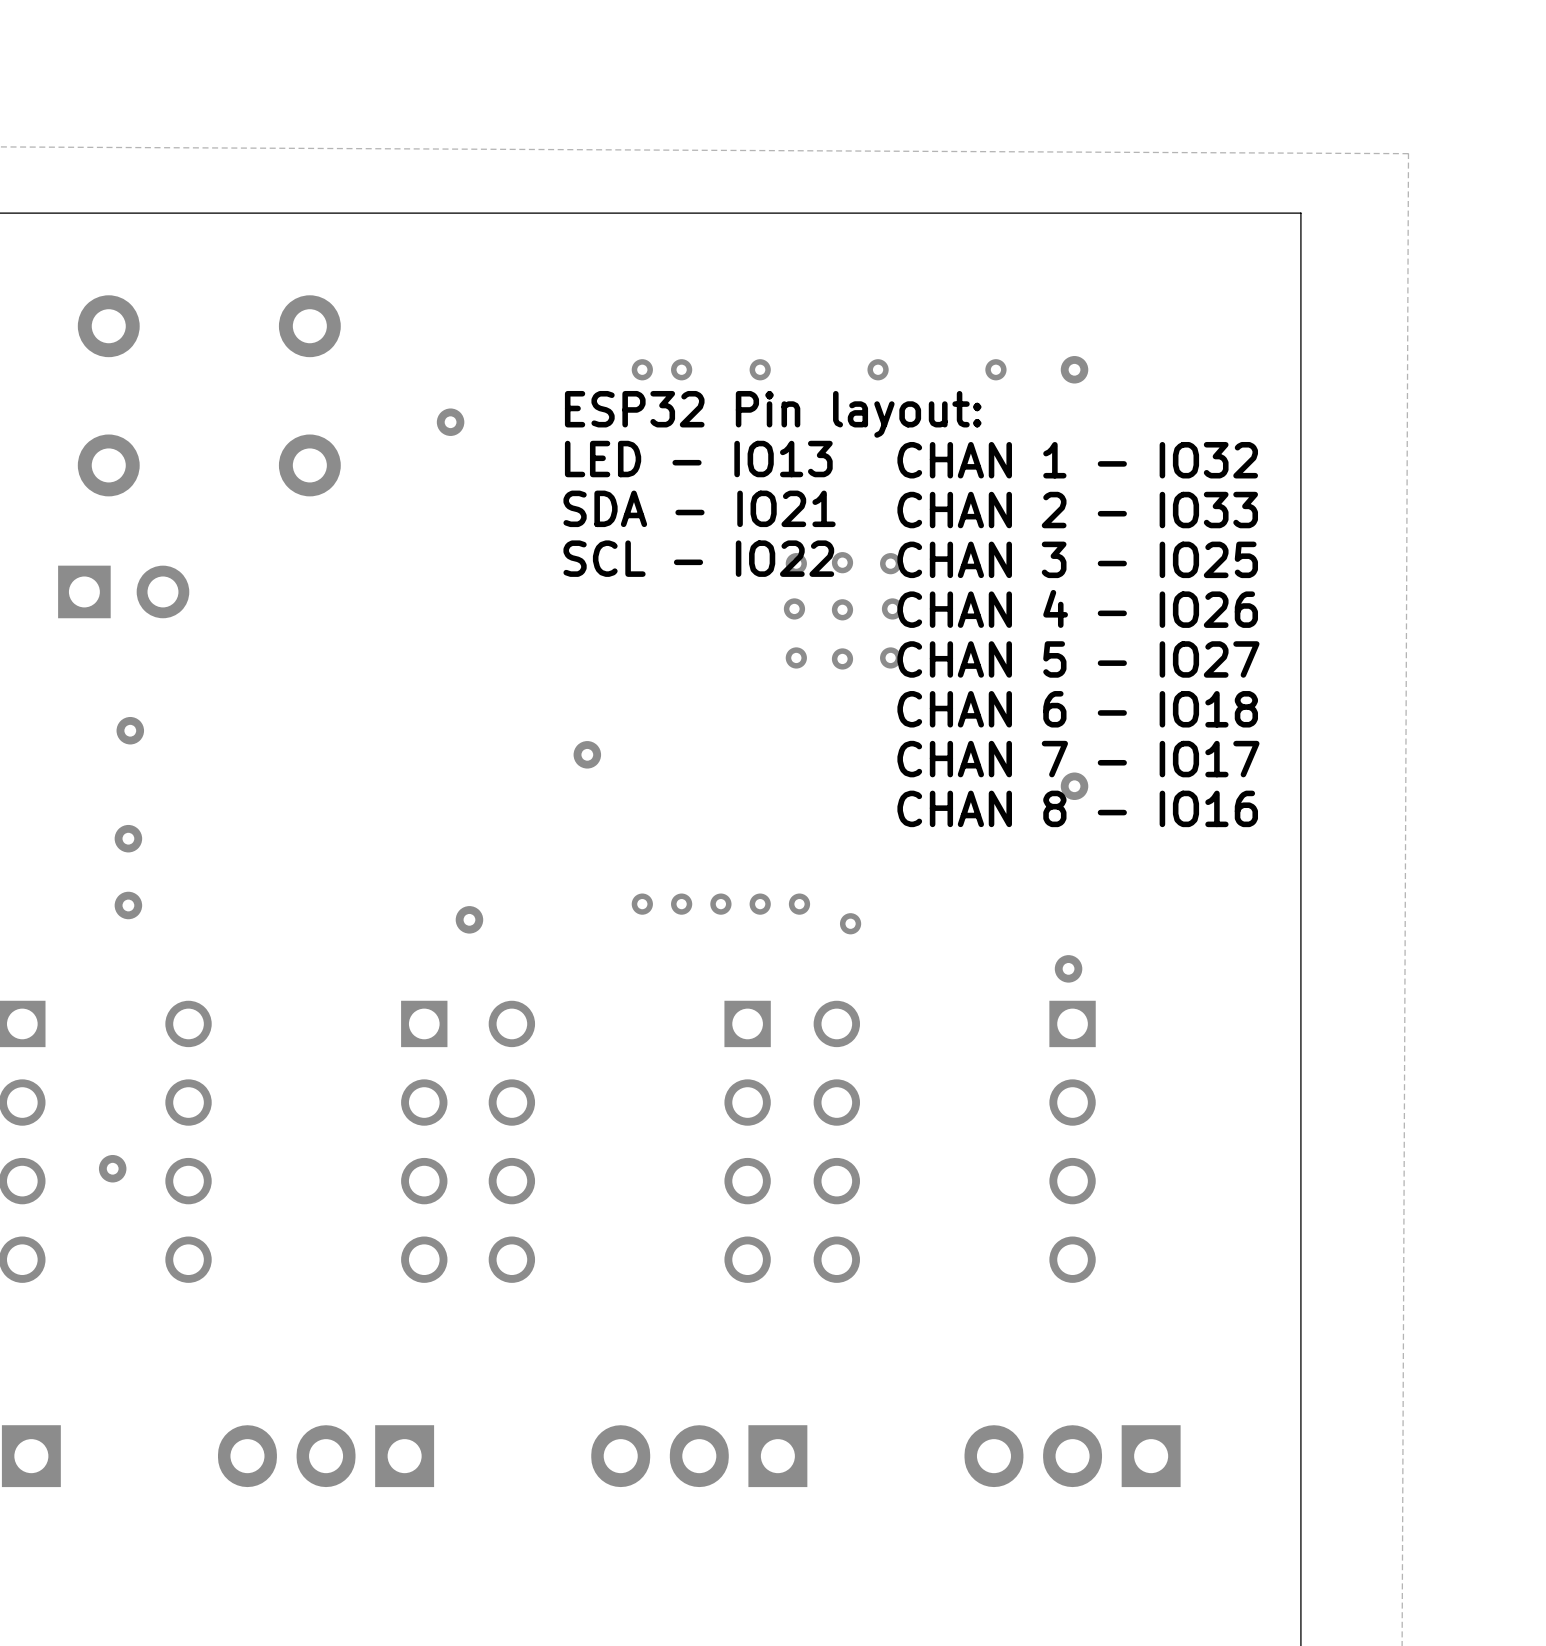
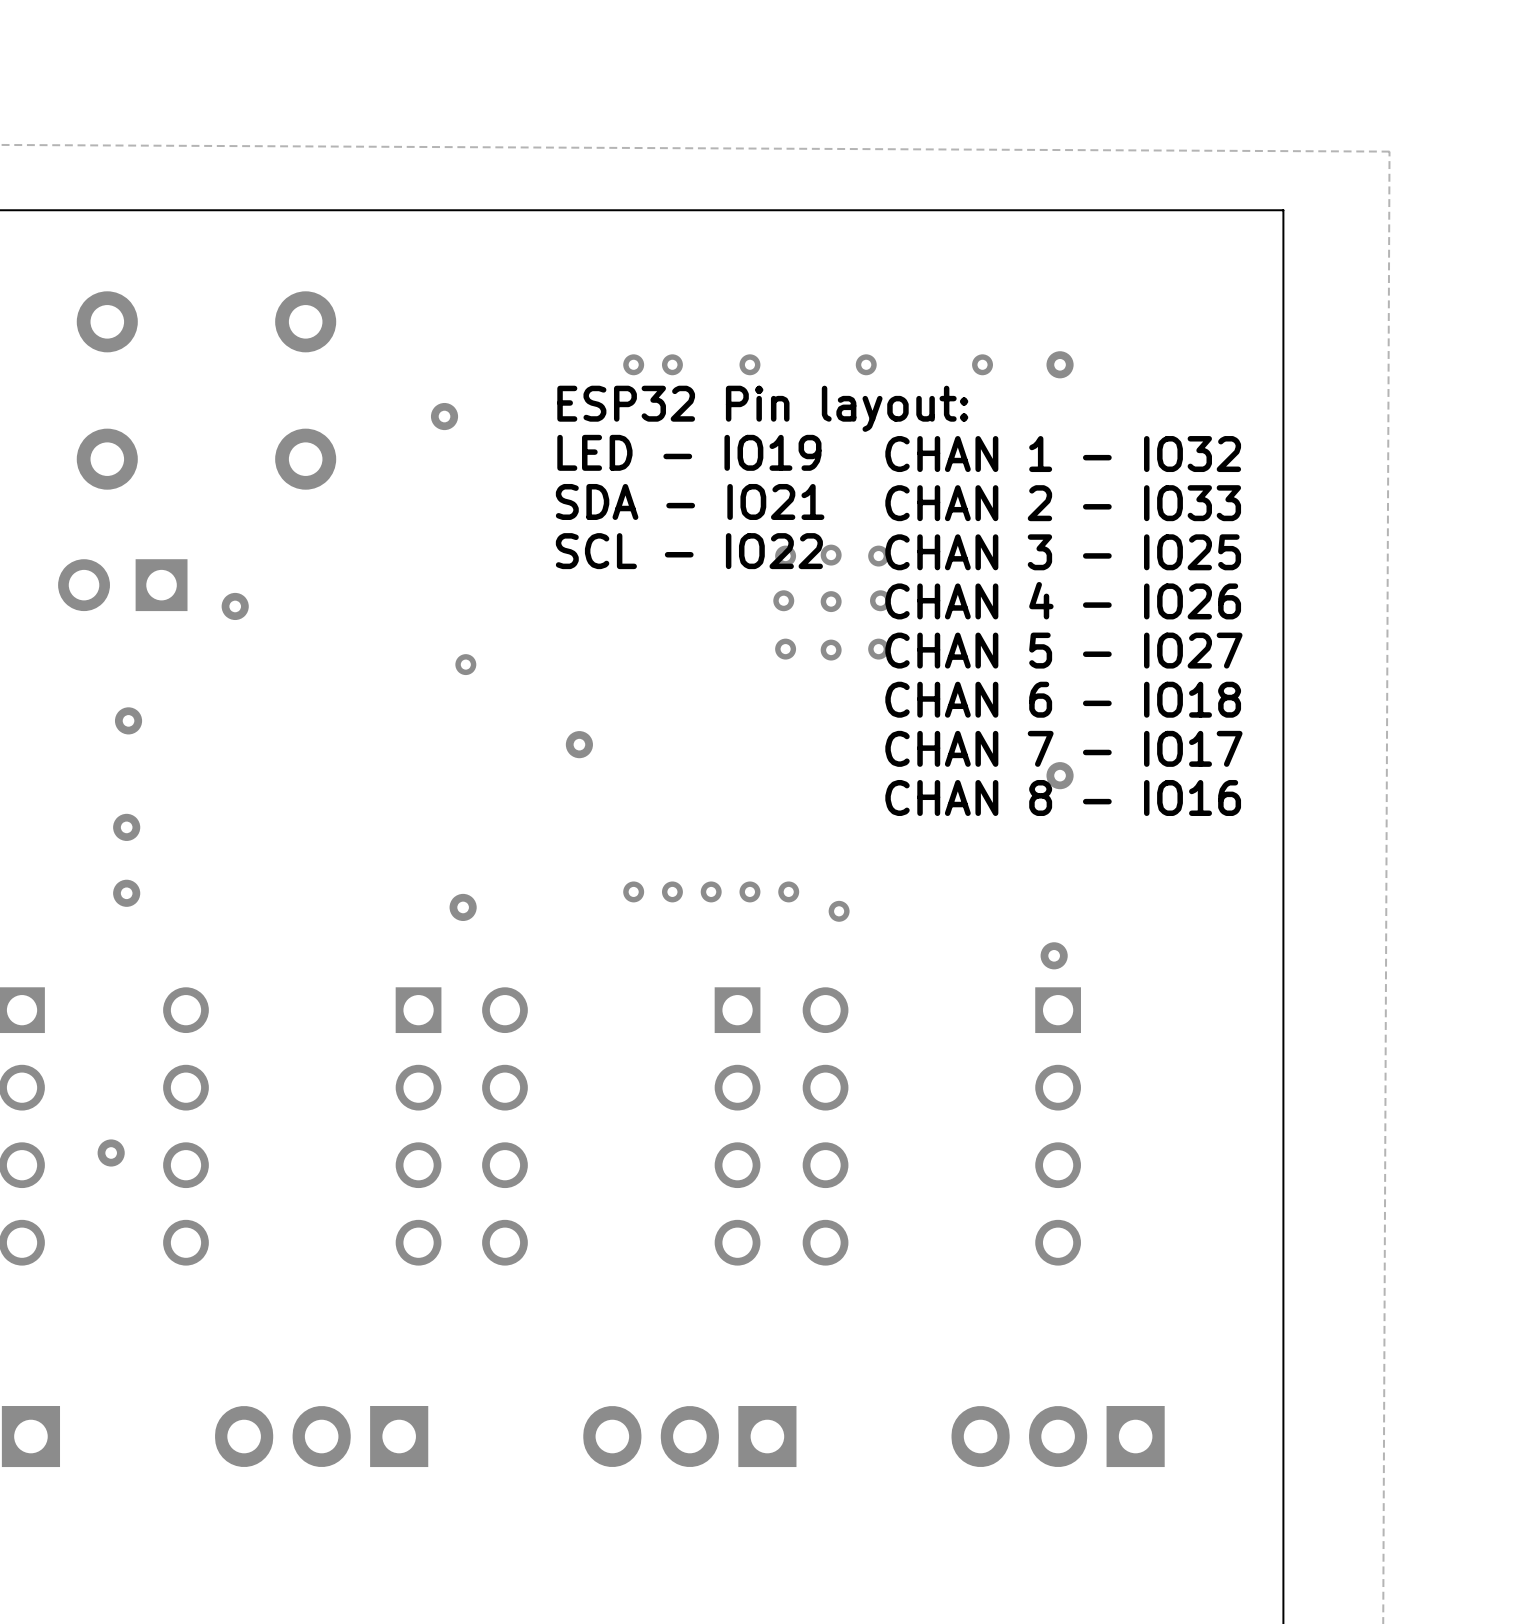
text: LED - IO13 (698, 459) -> LED - IO19 (689, 452)
part rotation: 0° (123, 591) -> 180° (122, 585)
via: none -> (235, 606)
via: none -> (465, 664)

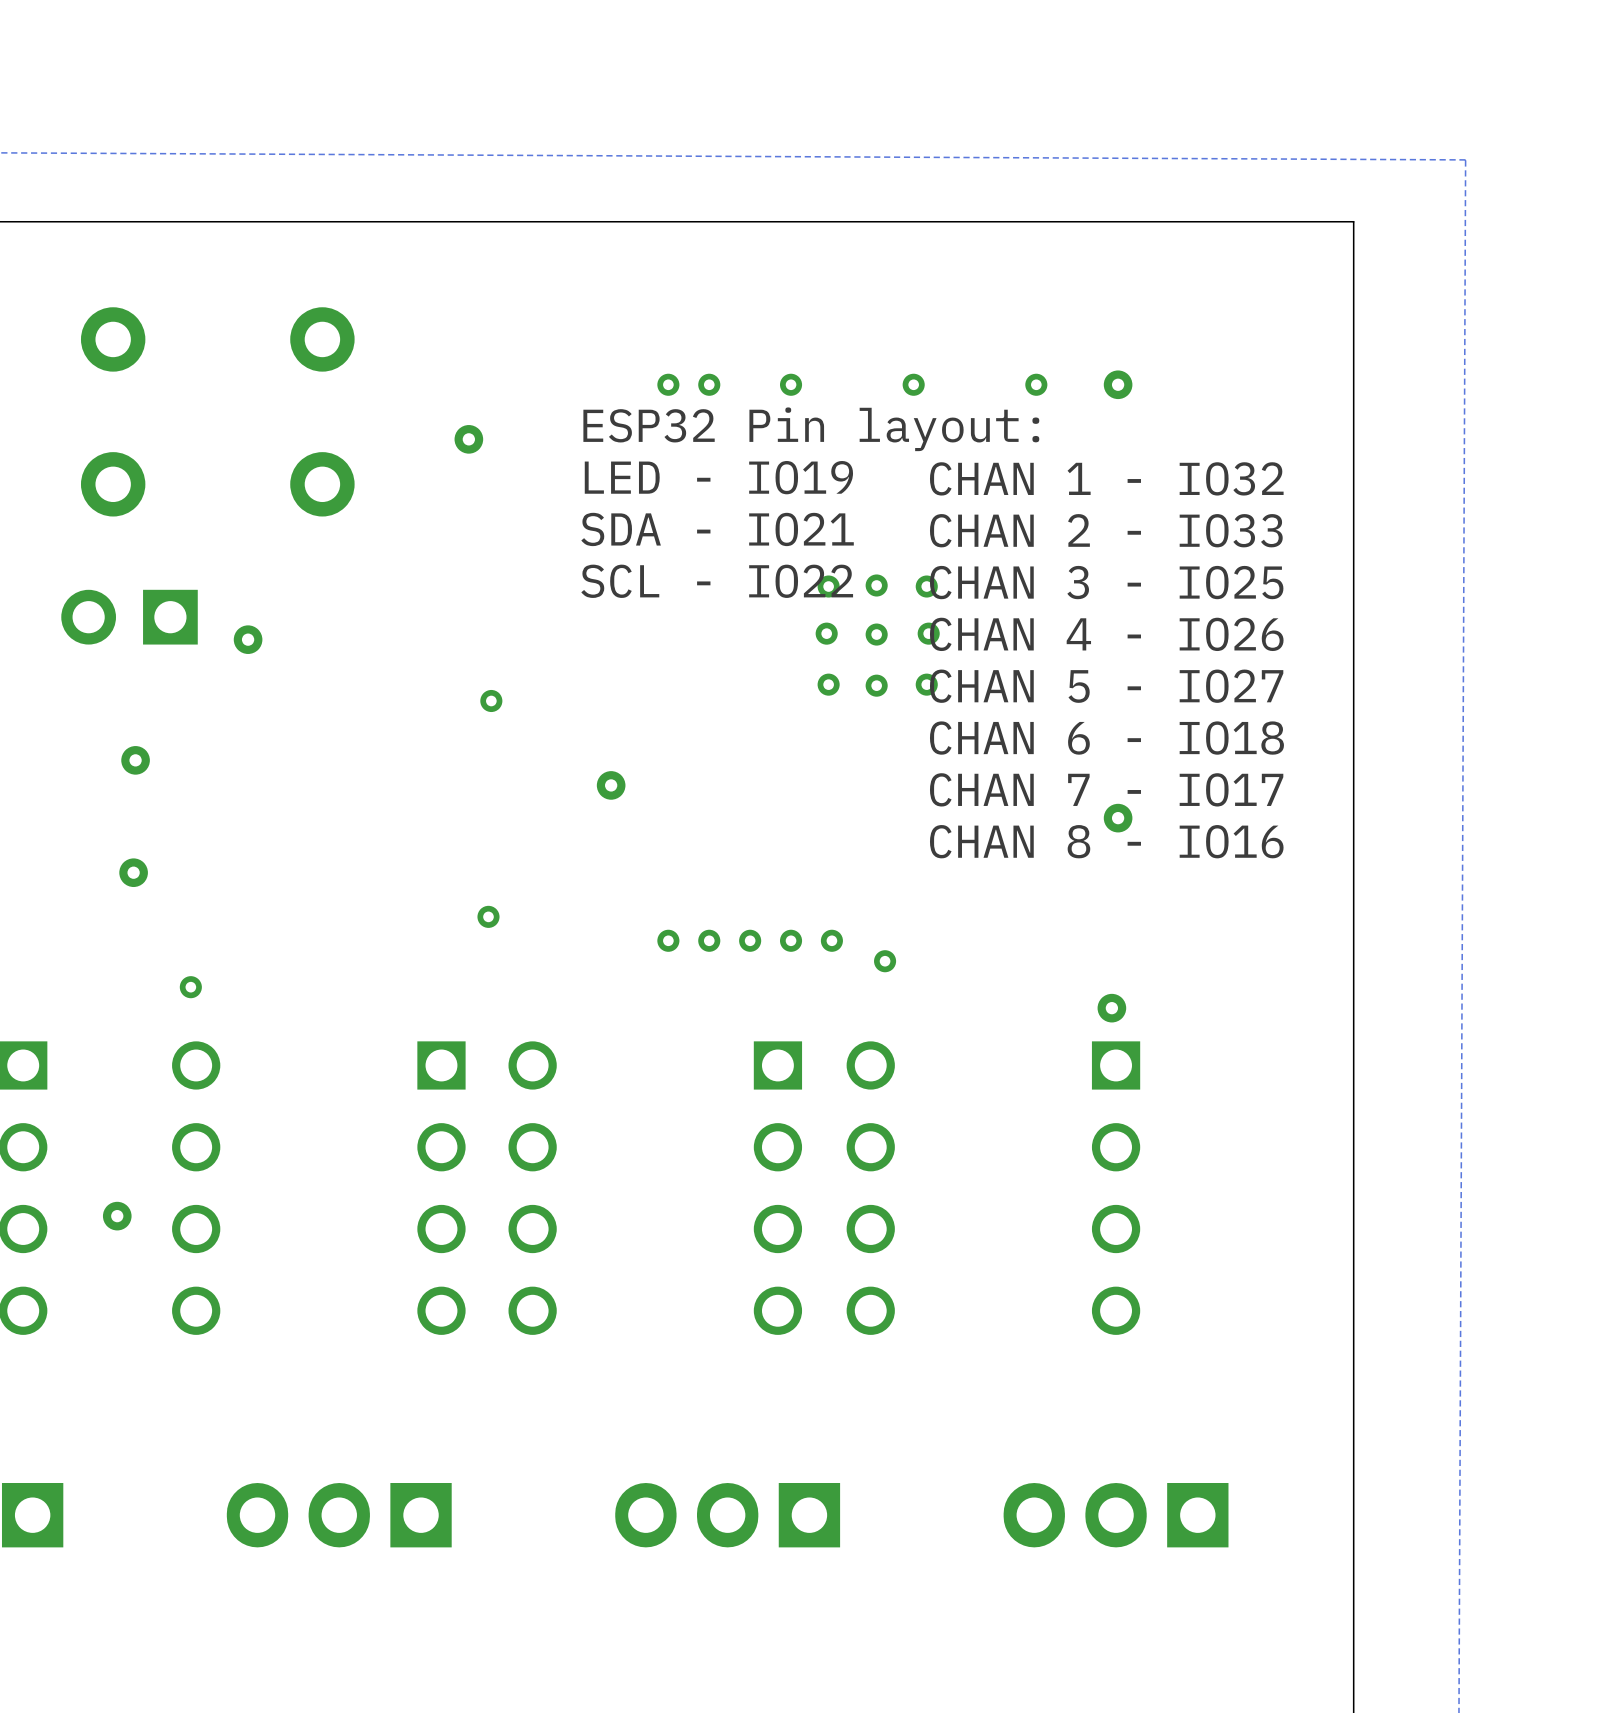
via: none -> (488, 916)
via: (126, 893) -> none
via: (463, 907) -> none
via: none -> (190, 987)

